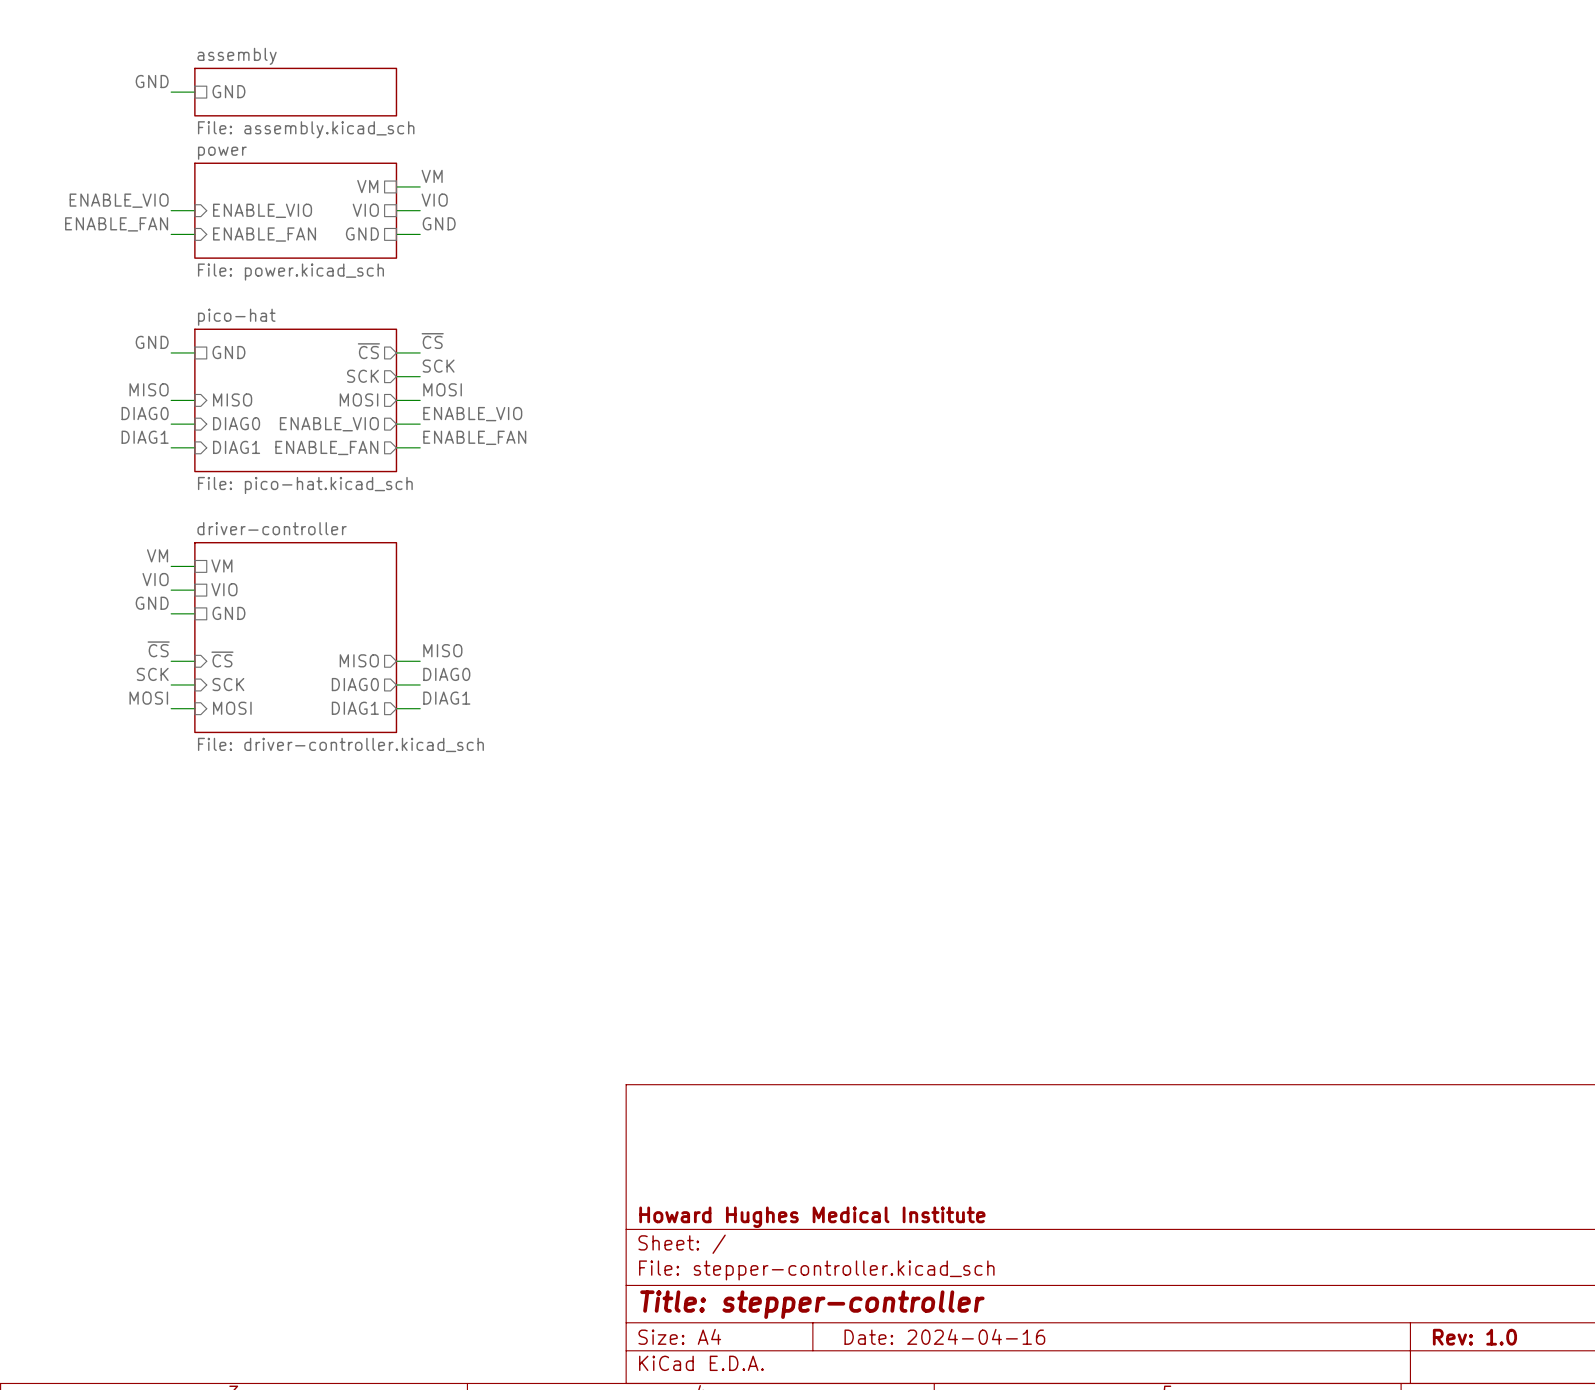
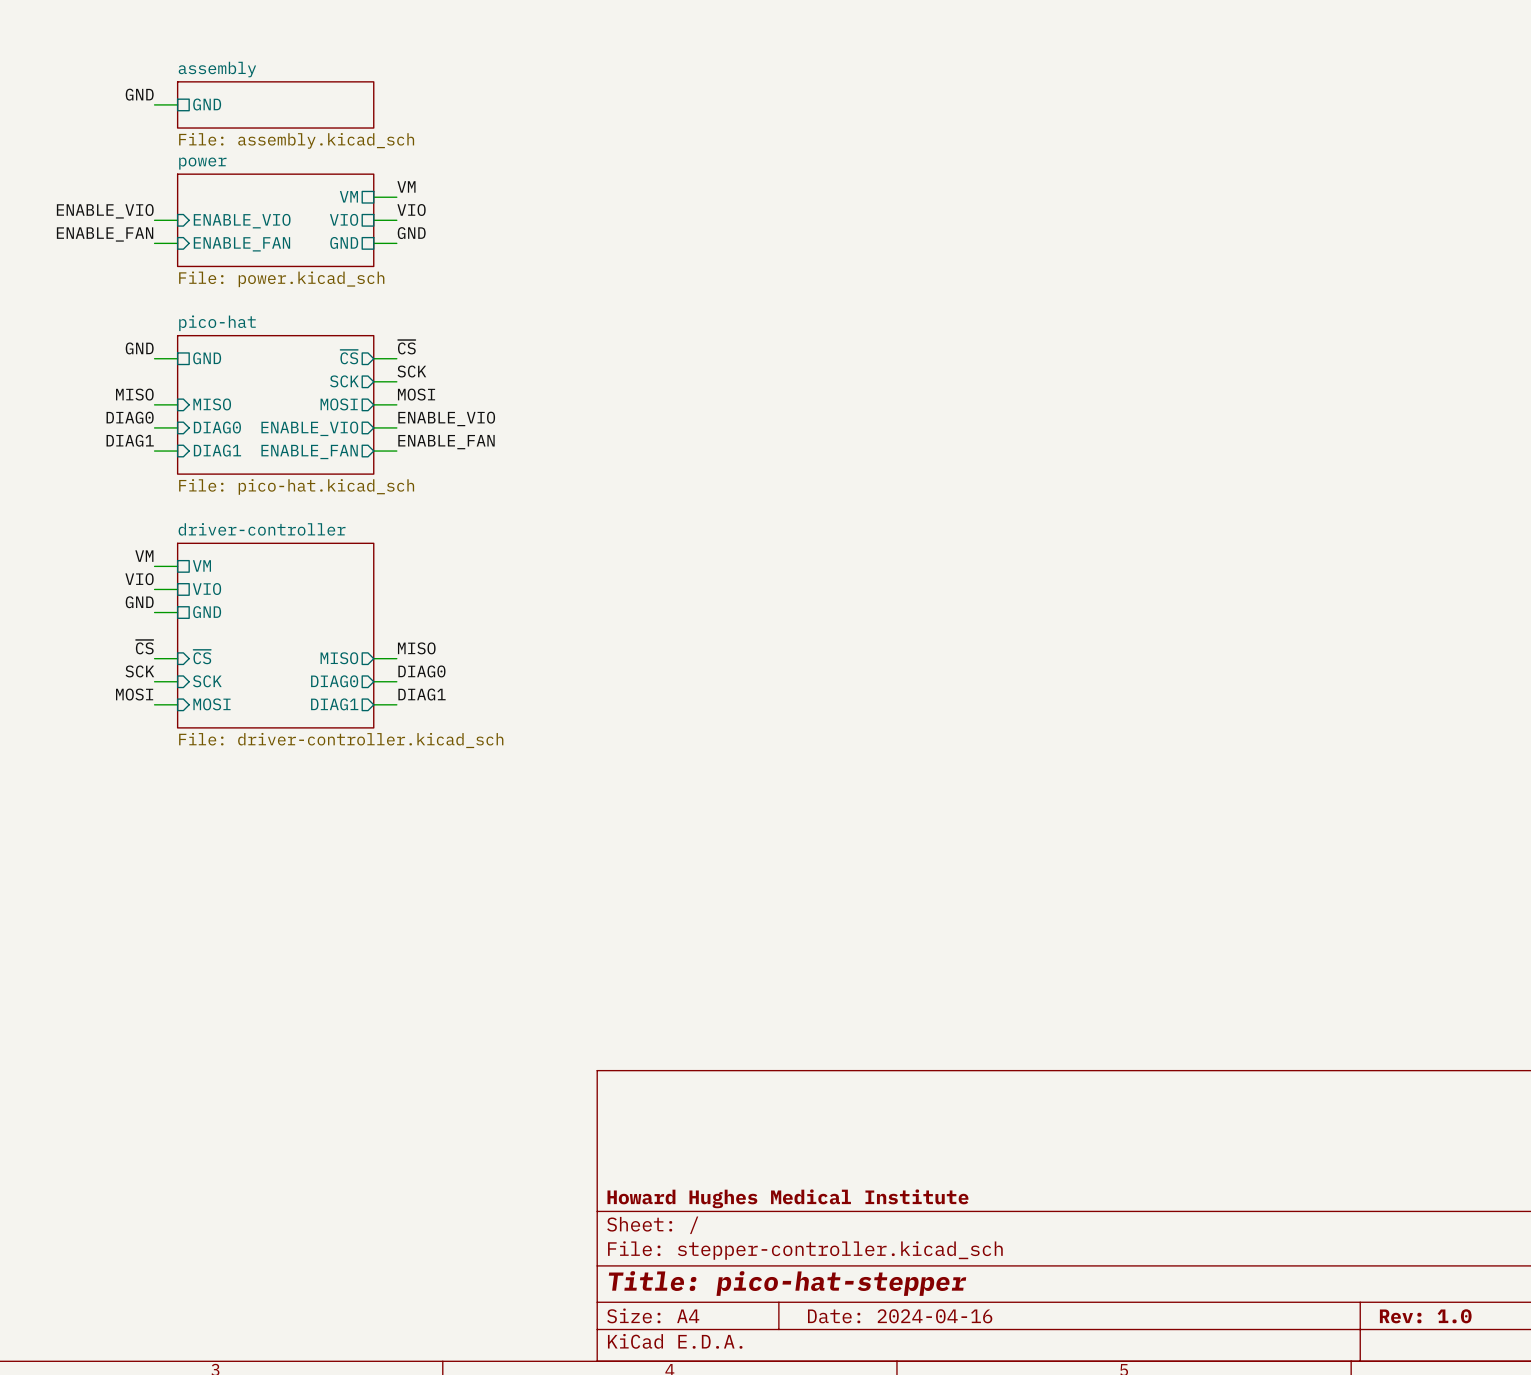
title block: Title: stepper-controller (812, 1304) -> Title: pico-hat-stepper (787, 1283)

